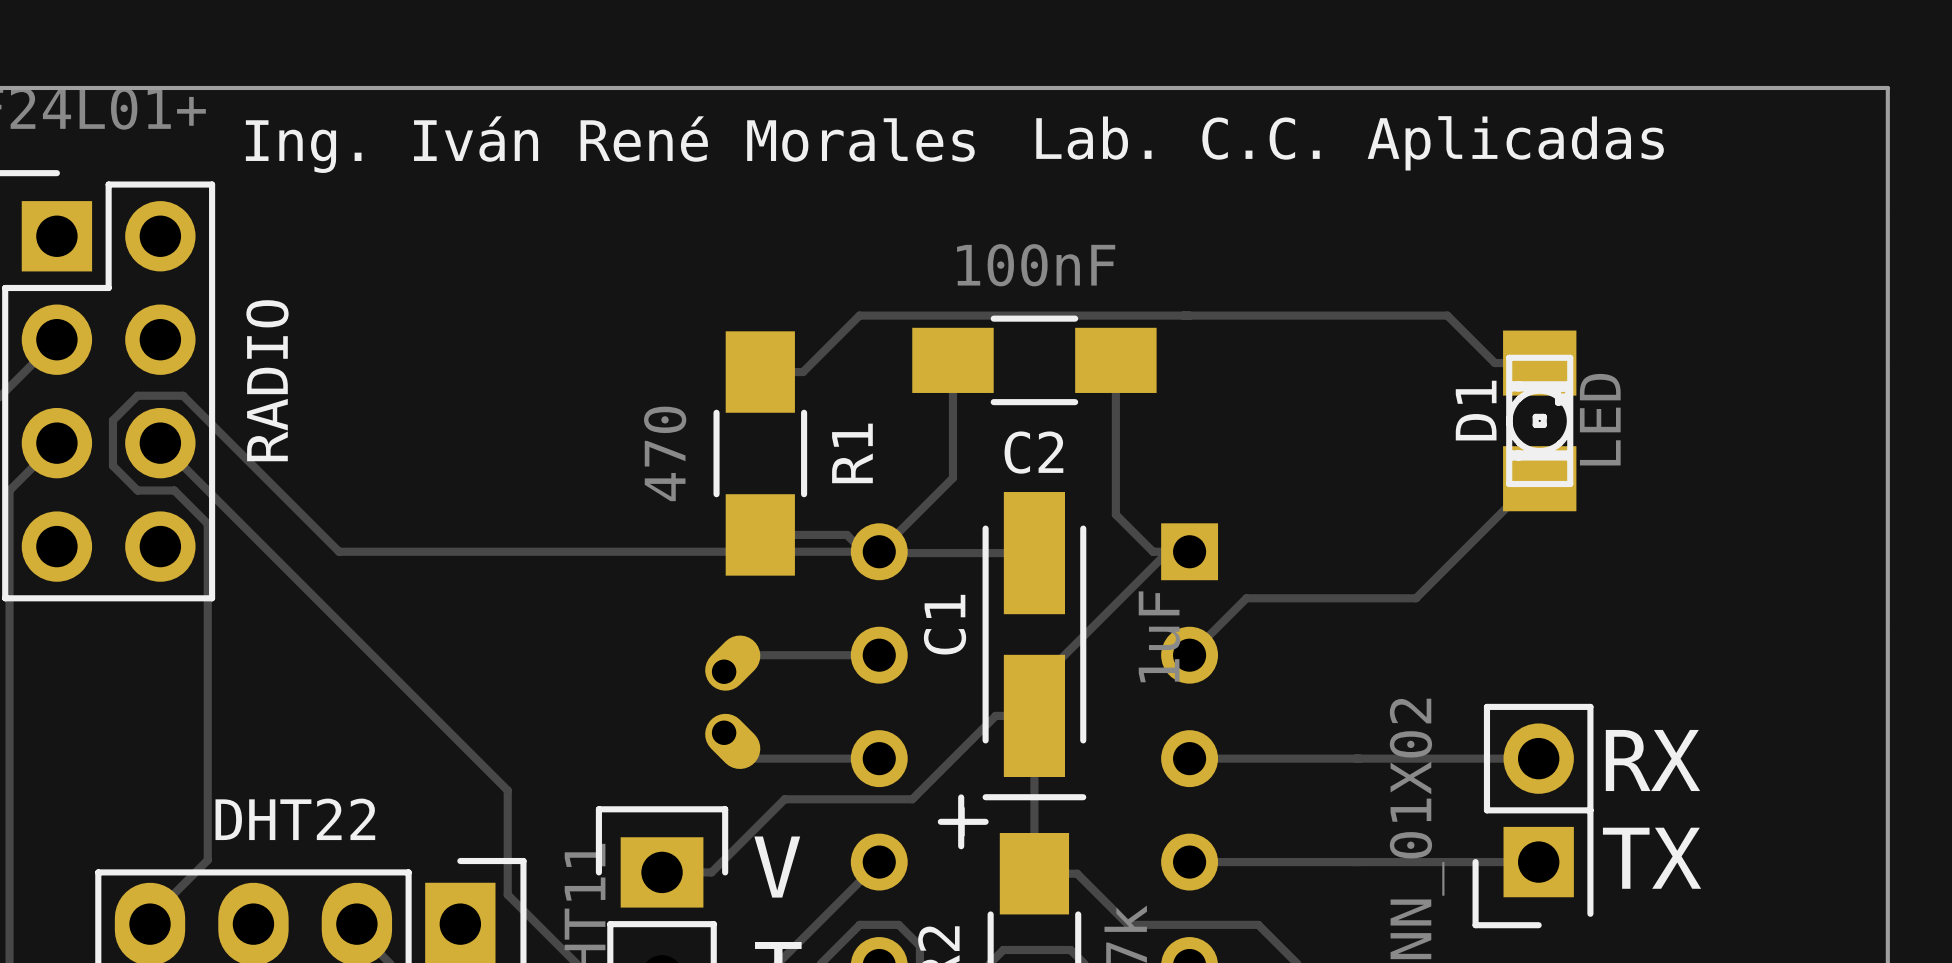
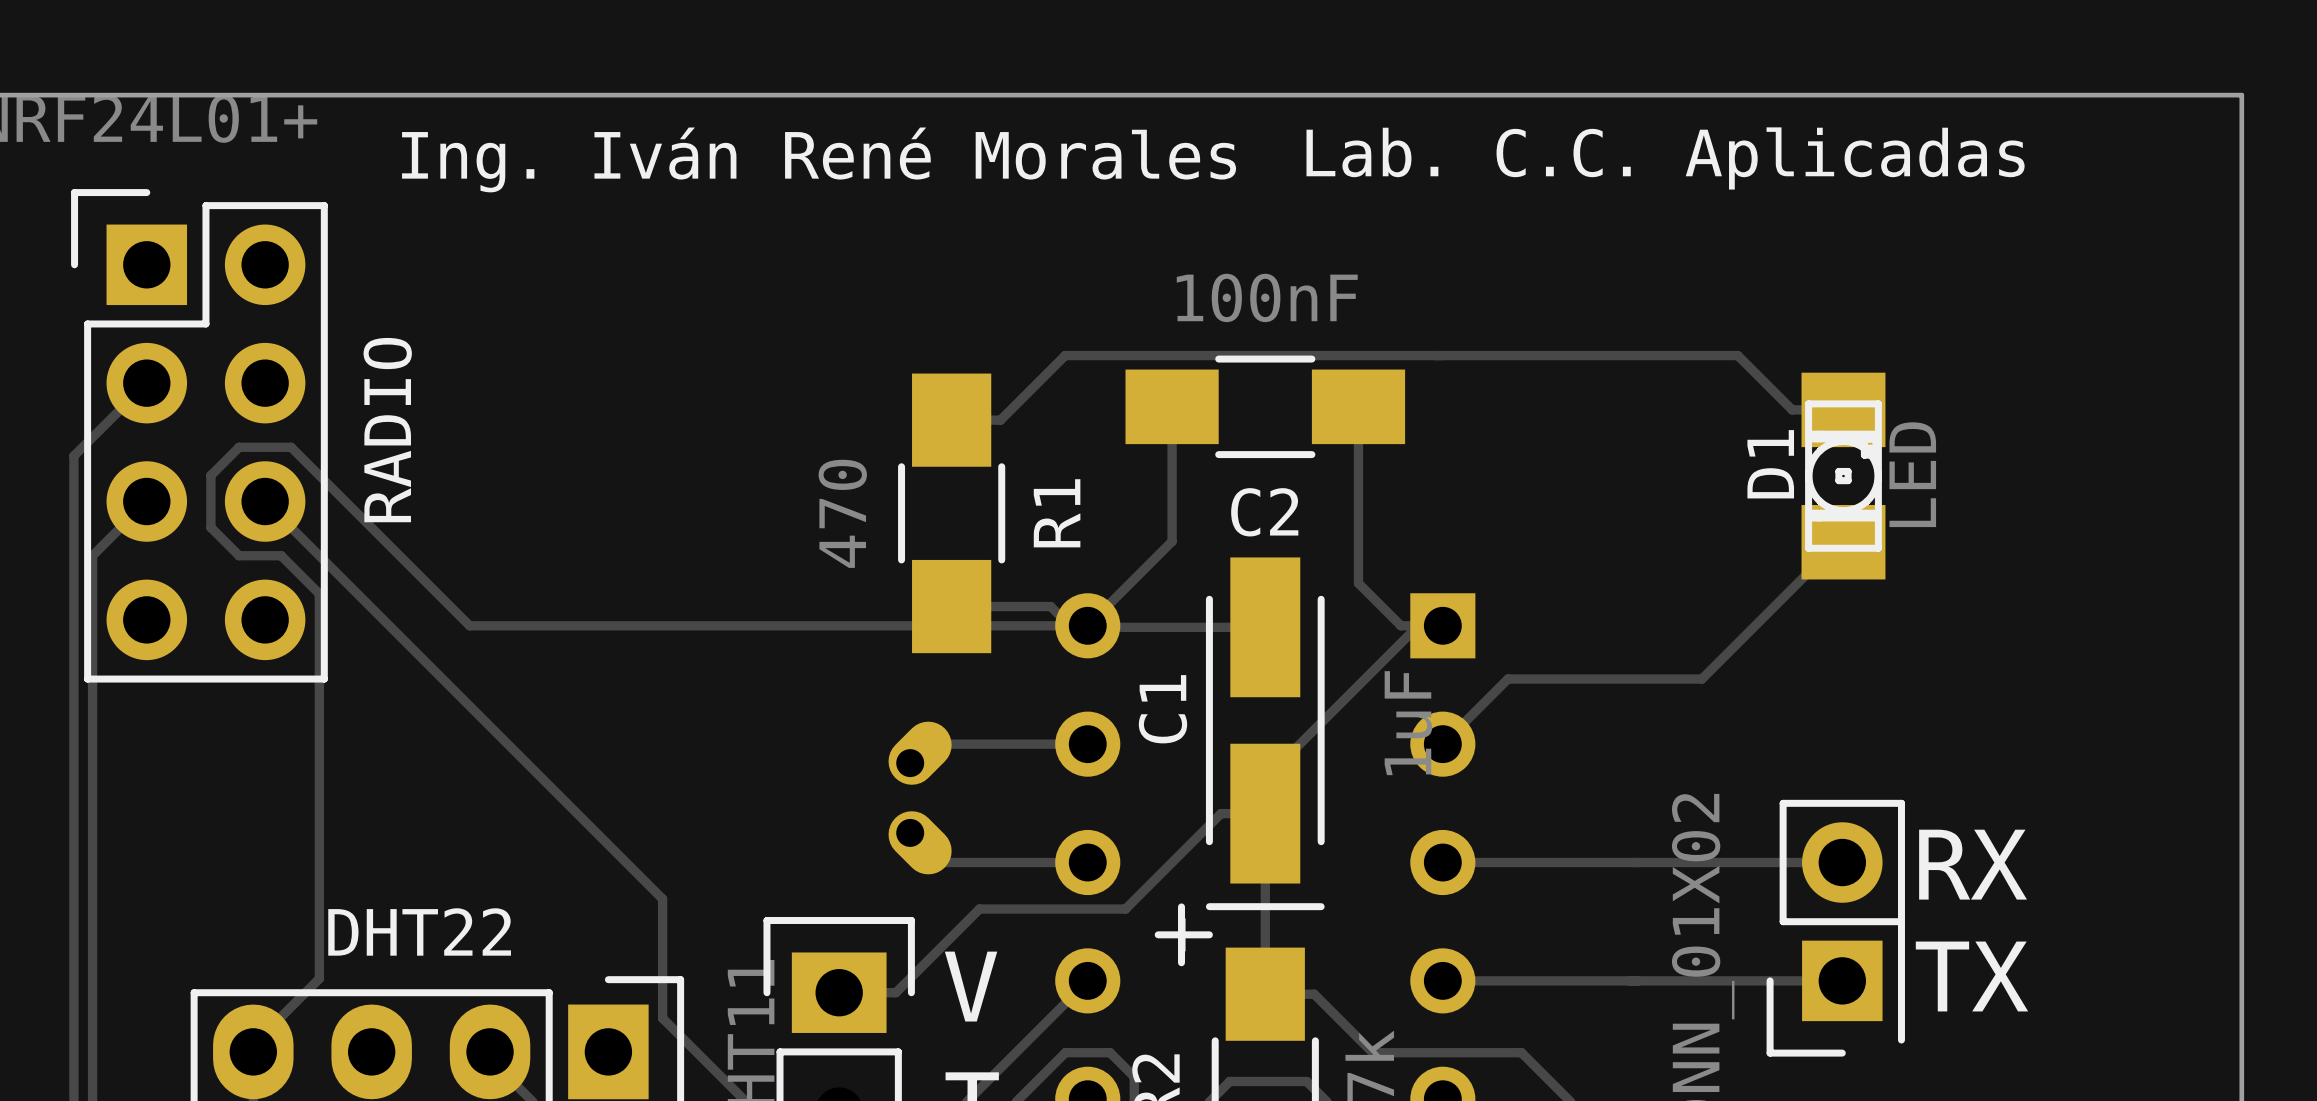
text position: Lab. C.C. Aplicadas (1350, 143) -> Lab. C.C. Aplicadas (1665, 158)
text position: Ing. Iván René Morales (610, 144) -> Ing. Iván René Morales (819, 159)

